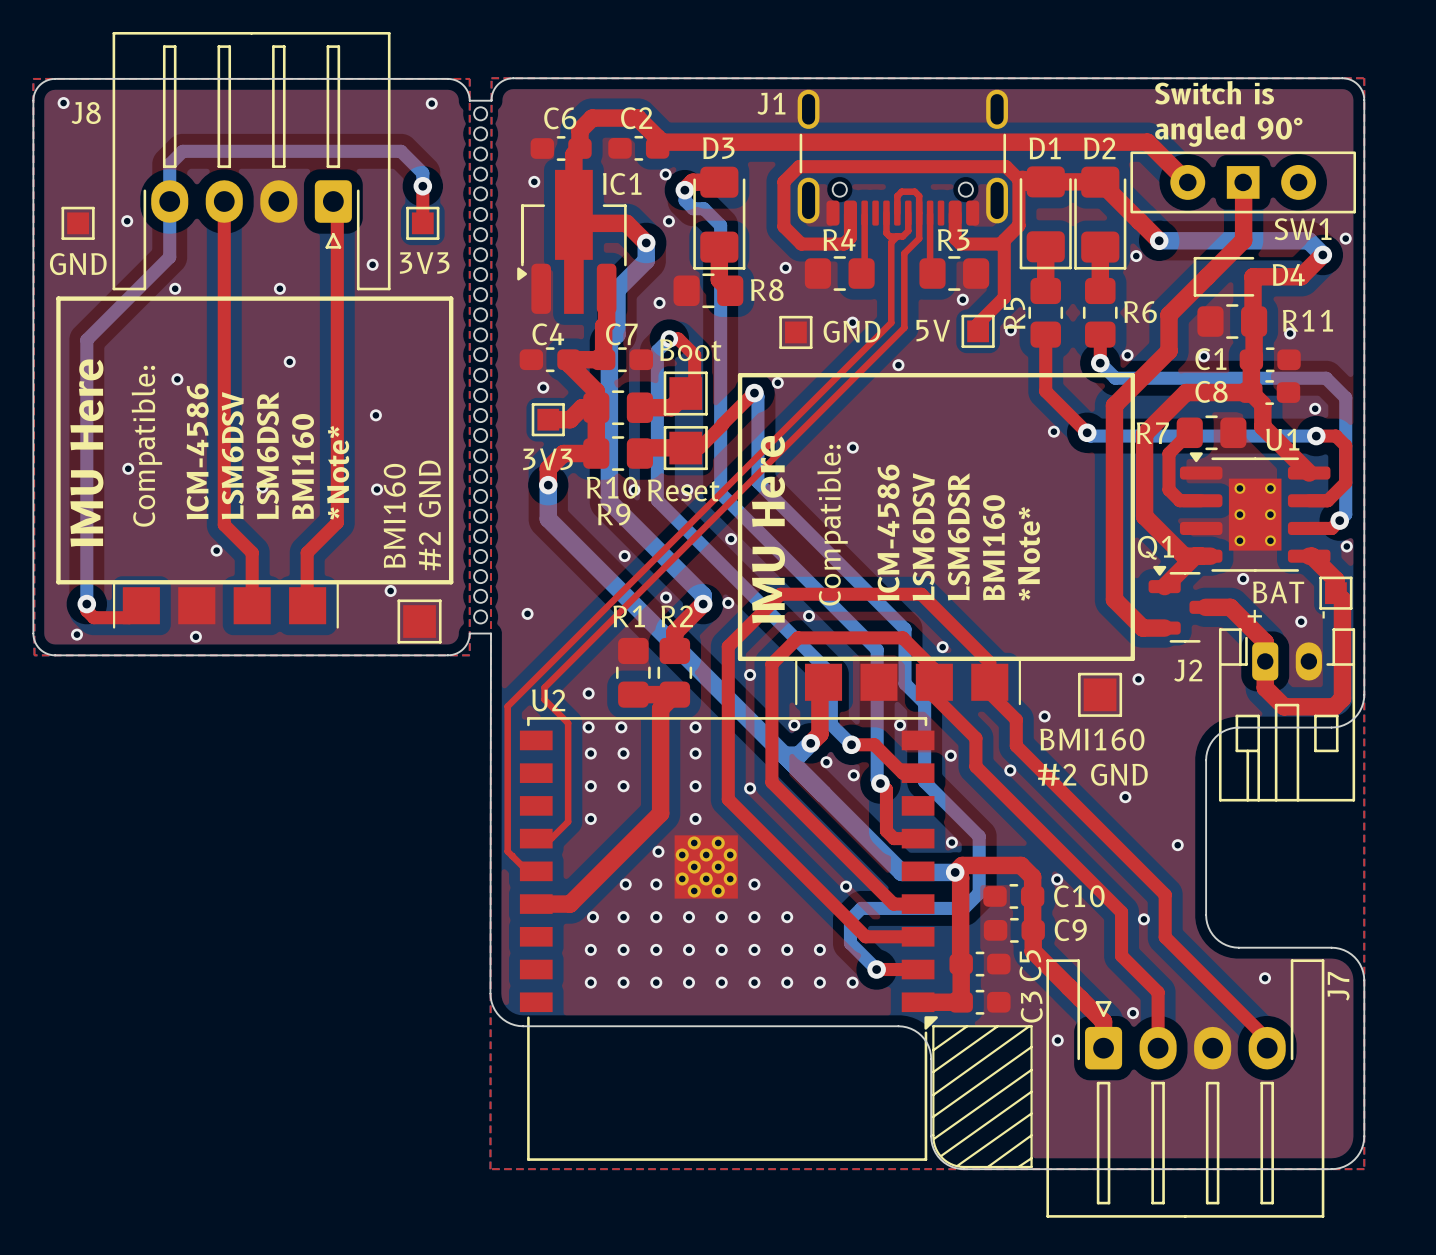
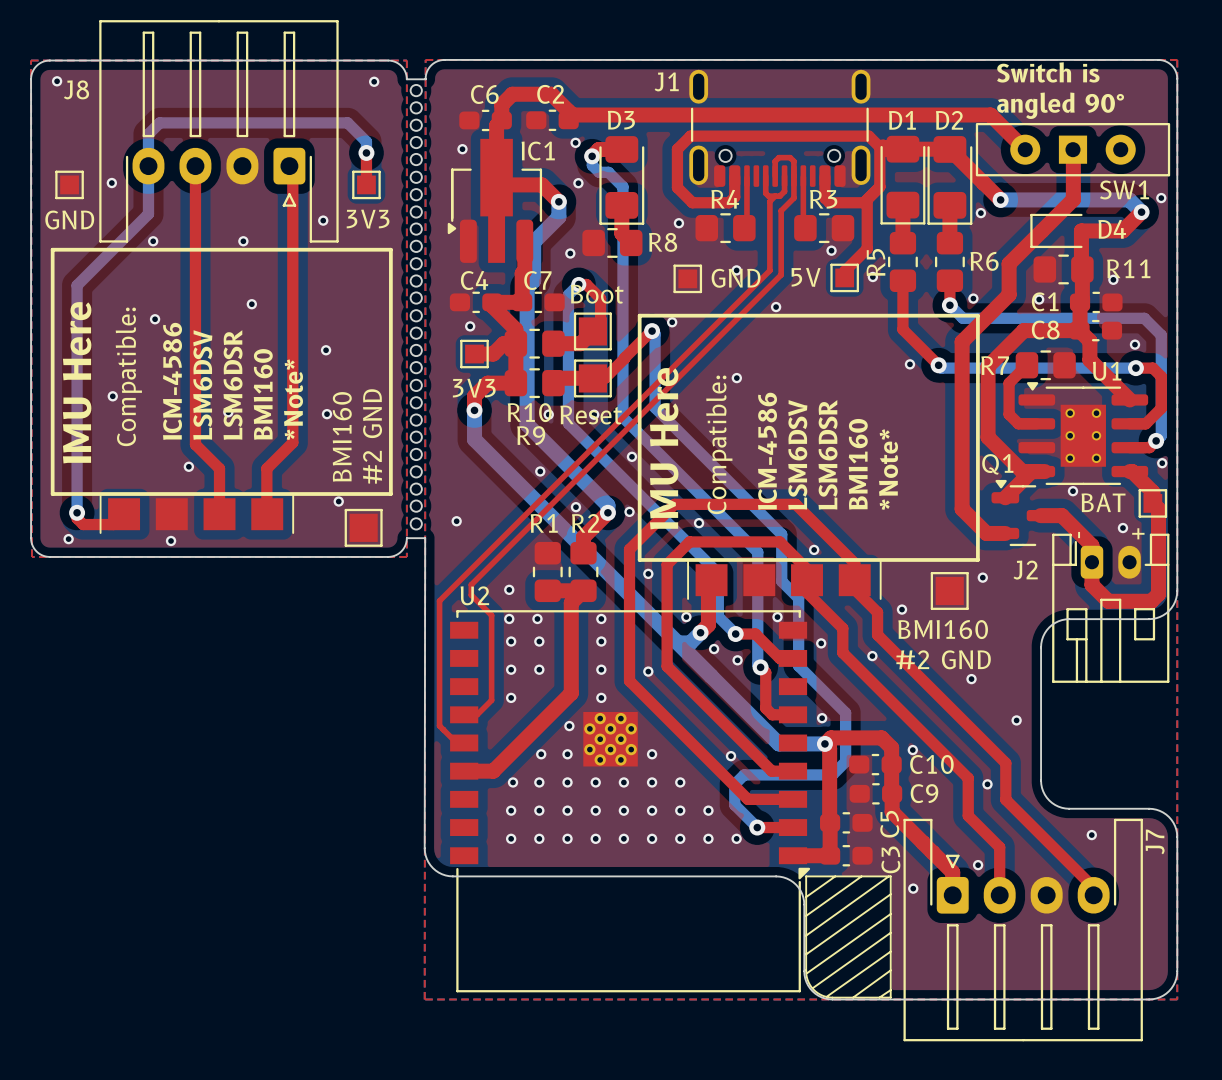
text rotation: 0° (1323, 614) -> 180° (1079, 535)
text position: - (1323, 614) -> - (1079, 535)
text rotation: 0° (1254, 616) -> 180° (1138, 533)
text position: + (1254, 616) -> + (1138, 533)

